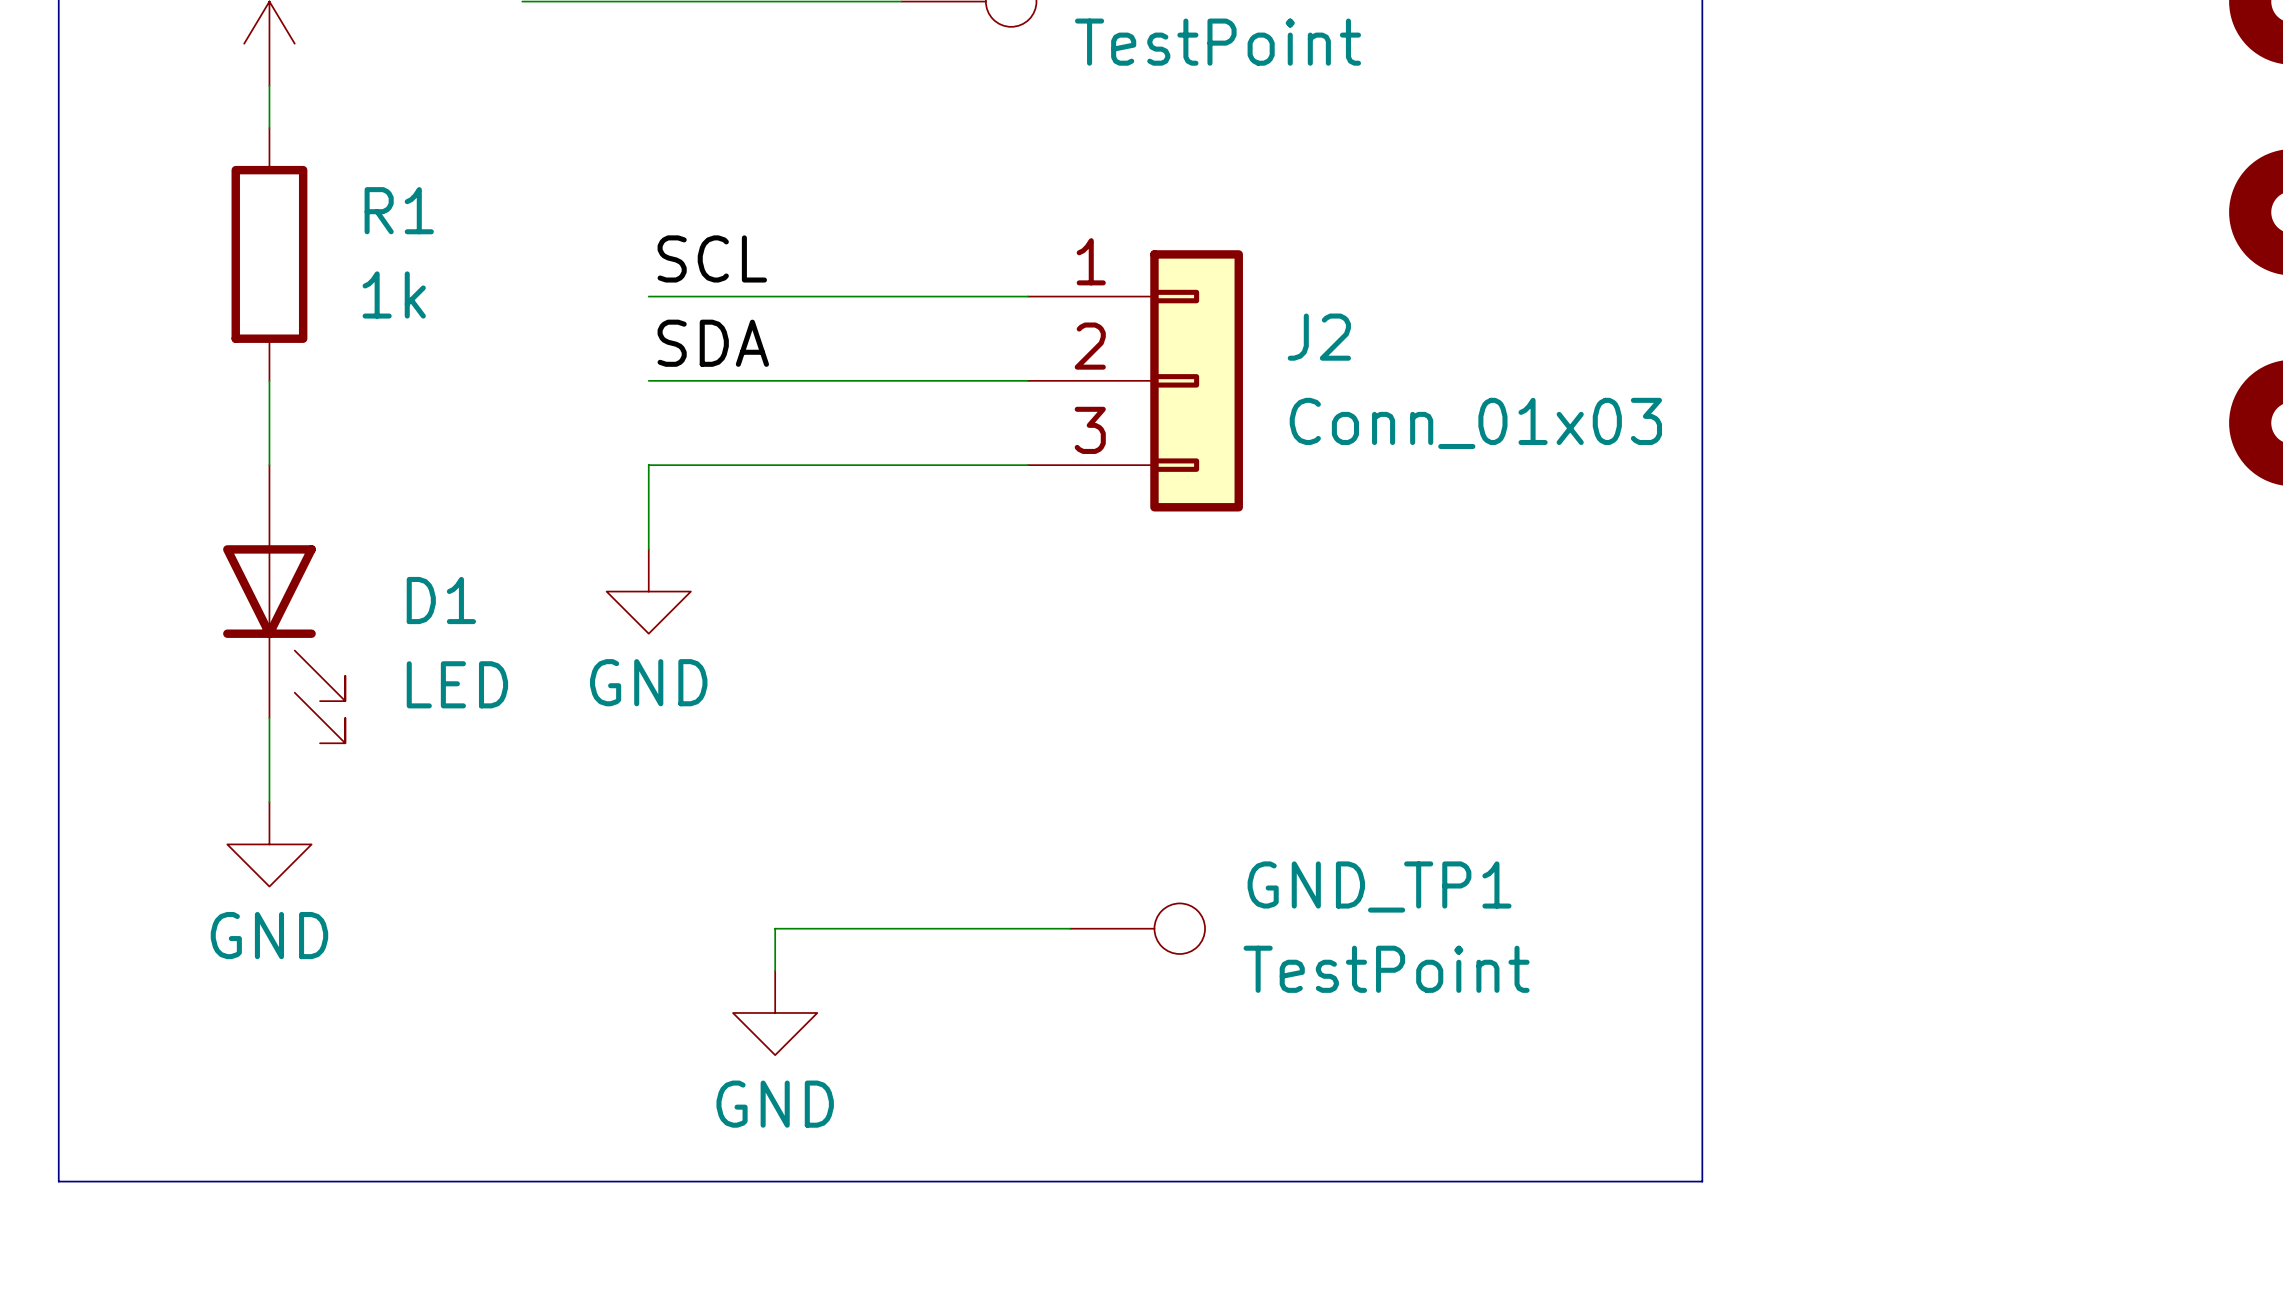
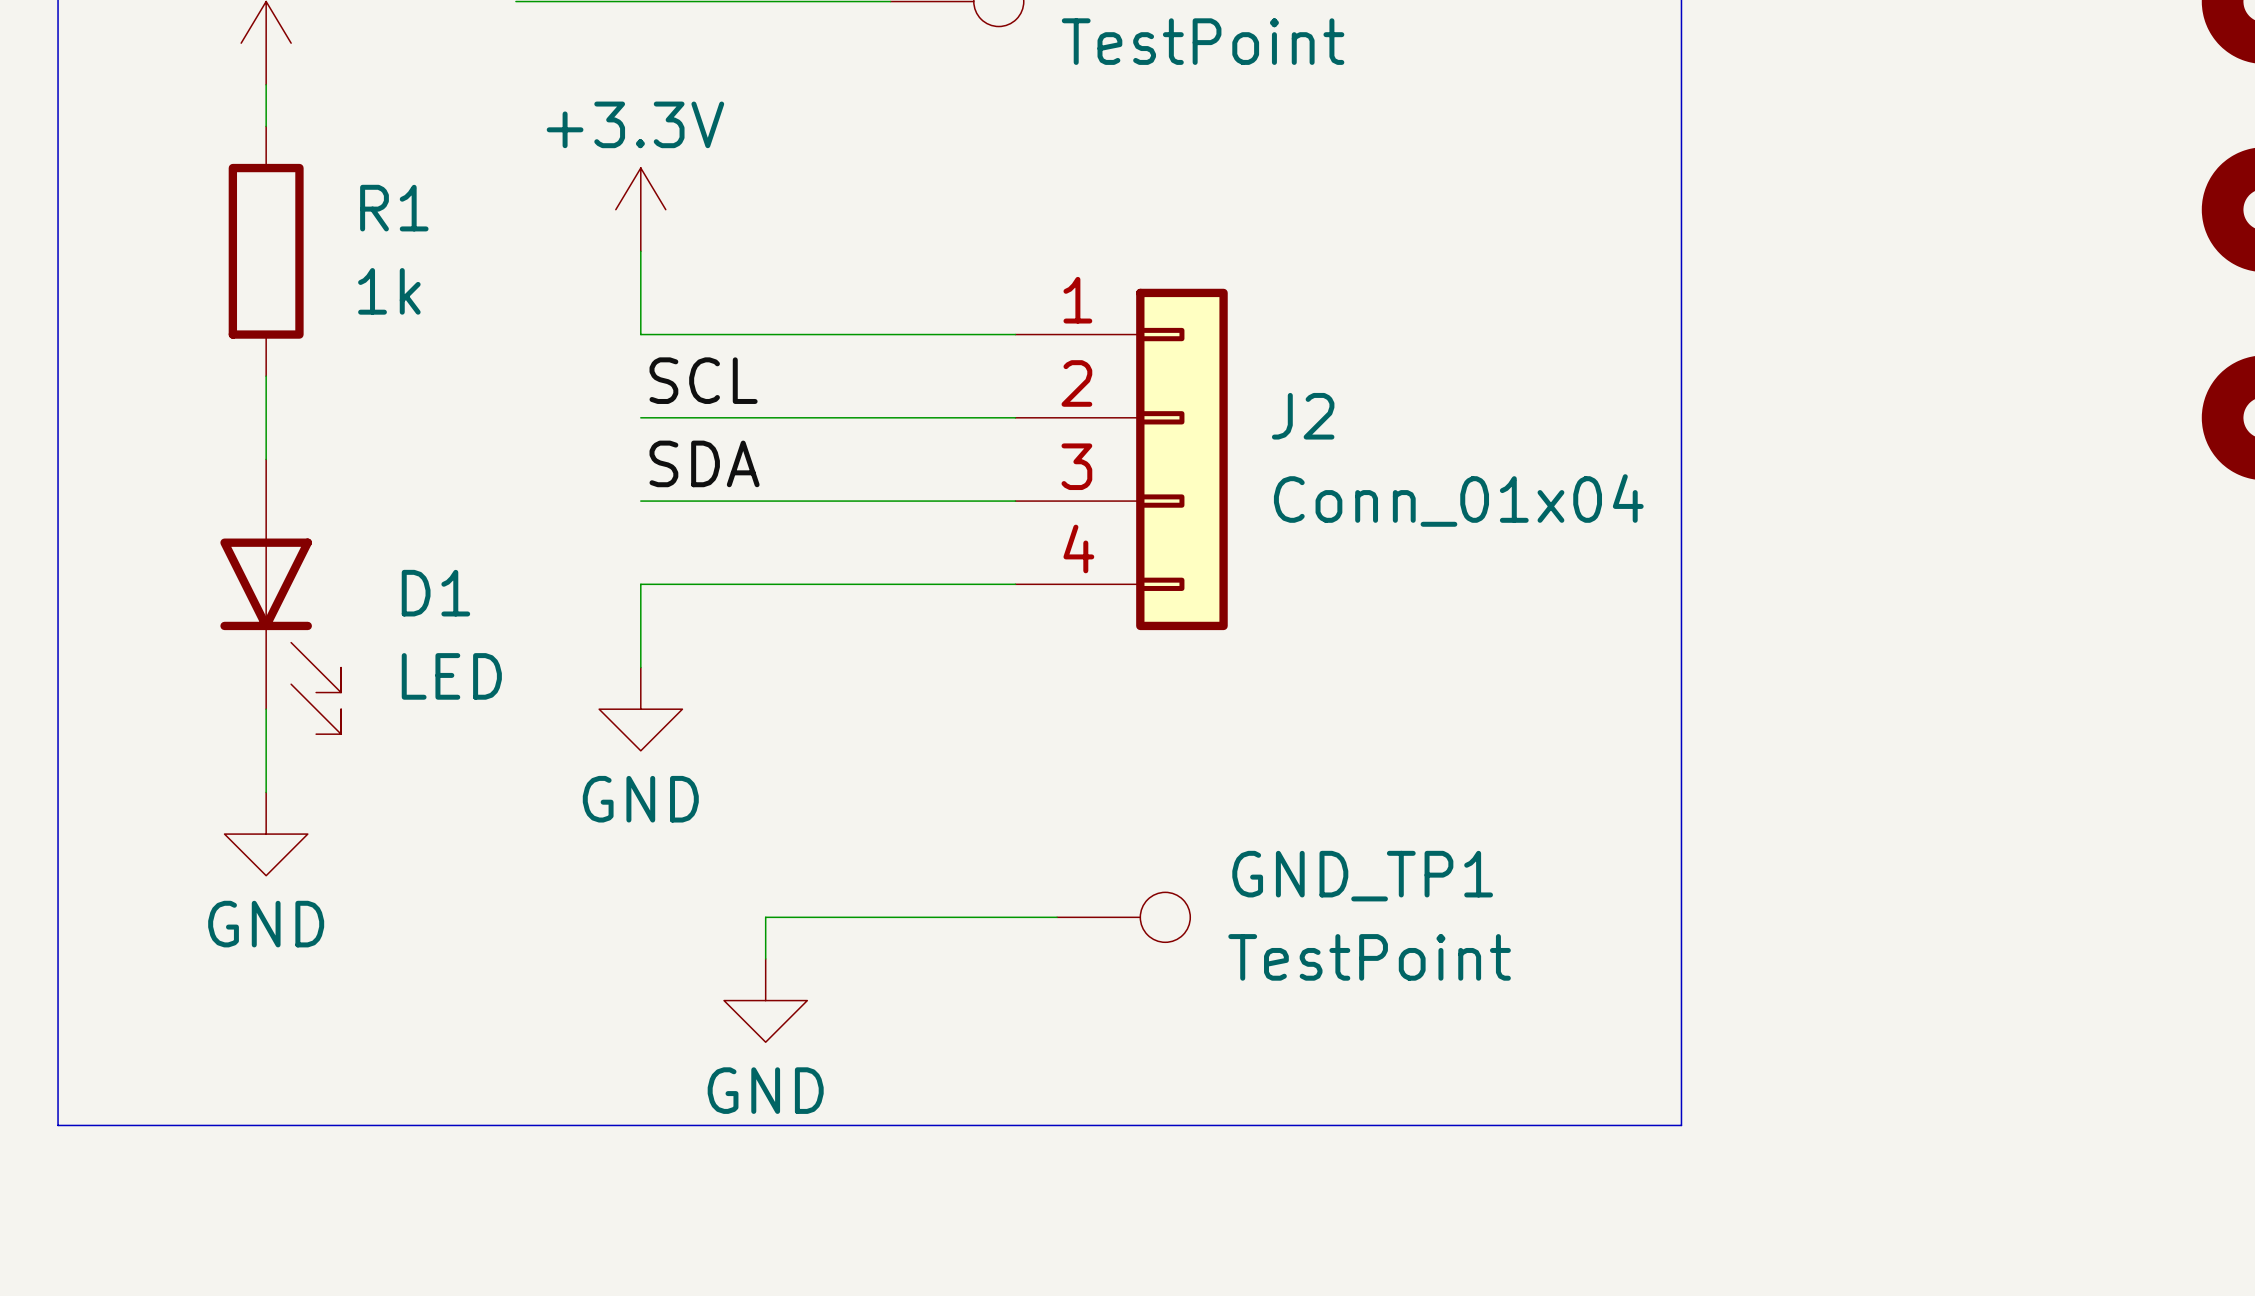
power symbol: none -> +3.3V (640, 209)
J2 symbol: [1028, 250, 1243, 512] -> [1015, 288, 1228, 631]
wire: none -> (640, 251) (640, 334) (1015, 334)
label position: SCL (712, 258) -> SCL (703, 380)
wire: (648, 296) (1028, 296) -> (640, 501) (1015, 501)
label position: SDA (713, 343) -> SDA (704, 463)
wire: (648, 380) (1028, 380) -> (640, 417) (1015, 417)
J2 value: Conn_01x03 (1475, 423) -> Conn_01x04 (1458, 500)
wire: (1028, 465) (648, 465) (648, 549) -> (1015, 584) (640, 584) (640, 667)
power symbol position: GND (648, 591) -> GND (640, 709)
line: (58, 1139) (58, 1181) (1702, 1181) (1702, 1139) -> (58, 1125) (1681, 1125)

